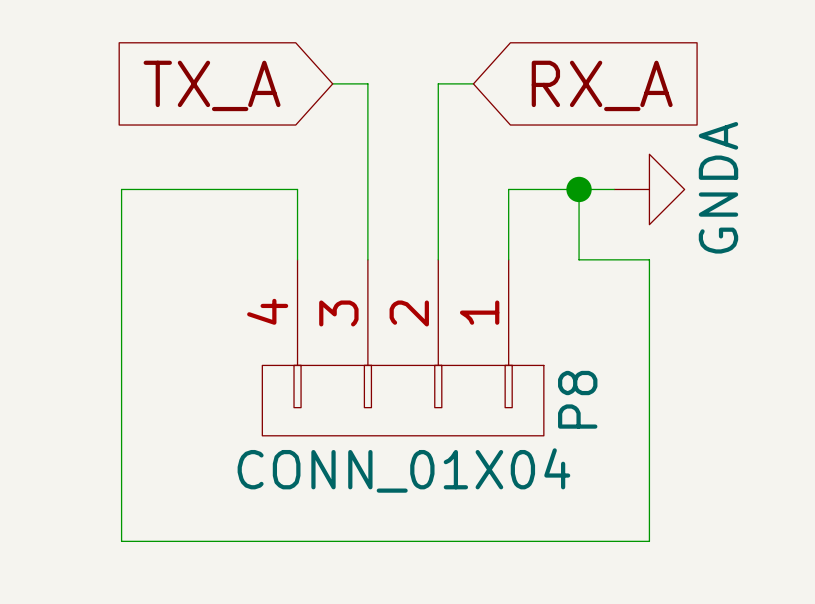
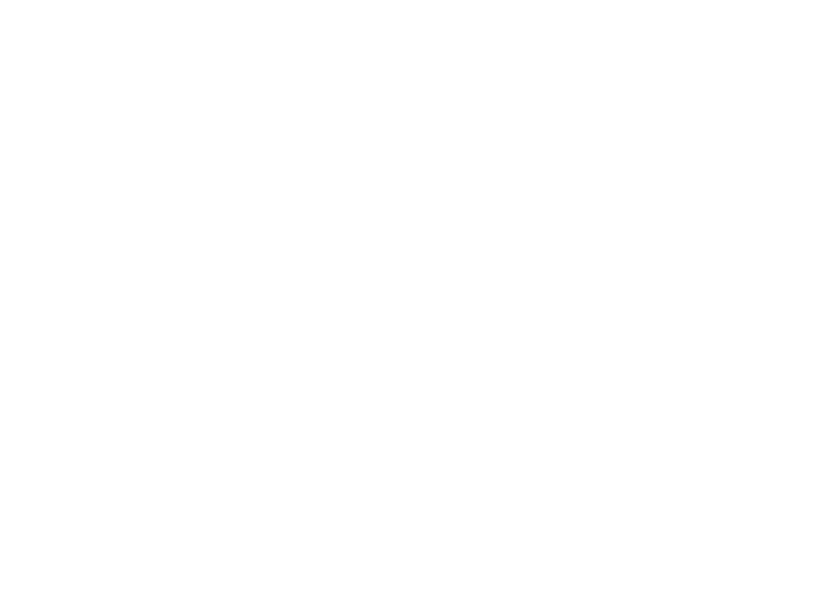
wire: (332, 83) (367, 83) (367, 259) -> none
wire: (473, 83) (438, 83) (438, 259) -> none
global label: TX_A (212, 85) -> none
global label: RX_A (602, 85) -> none
wire: (579, 189) (579, 259) (649, 259) (649, 541) (121, 541) (121, 189) (297, 189) (297, 259) -> none
junction: (579, 189) -> none
wire: (614, 189) (508, 189) (508, 259) -> none
power symbol: GNDA (649, 189) -> none
P8: CONN_01X04 (403, 347) -> none

